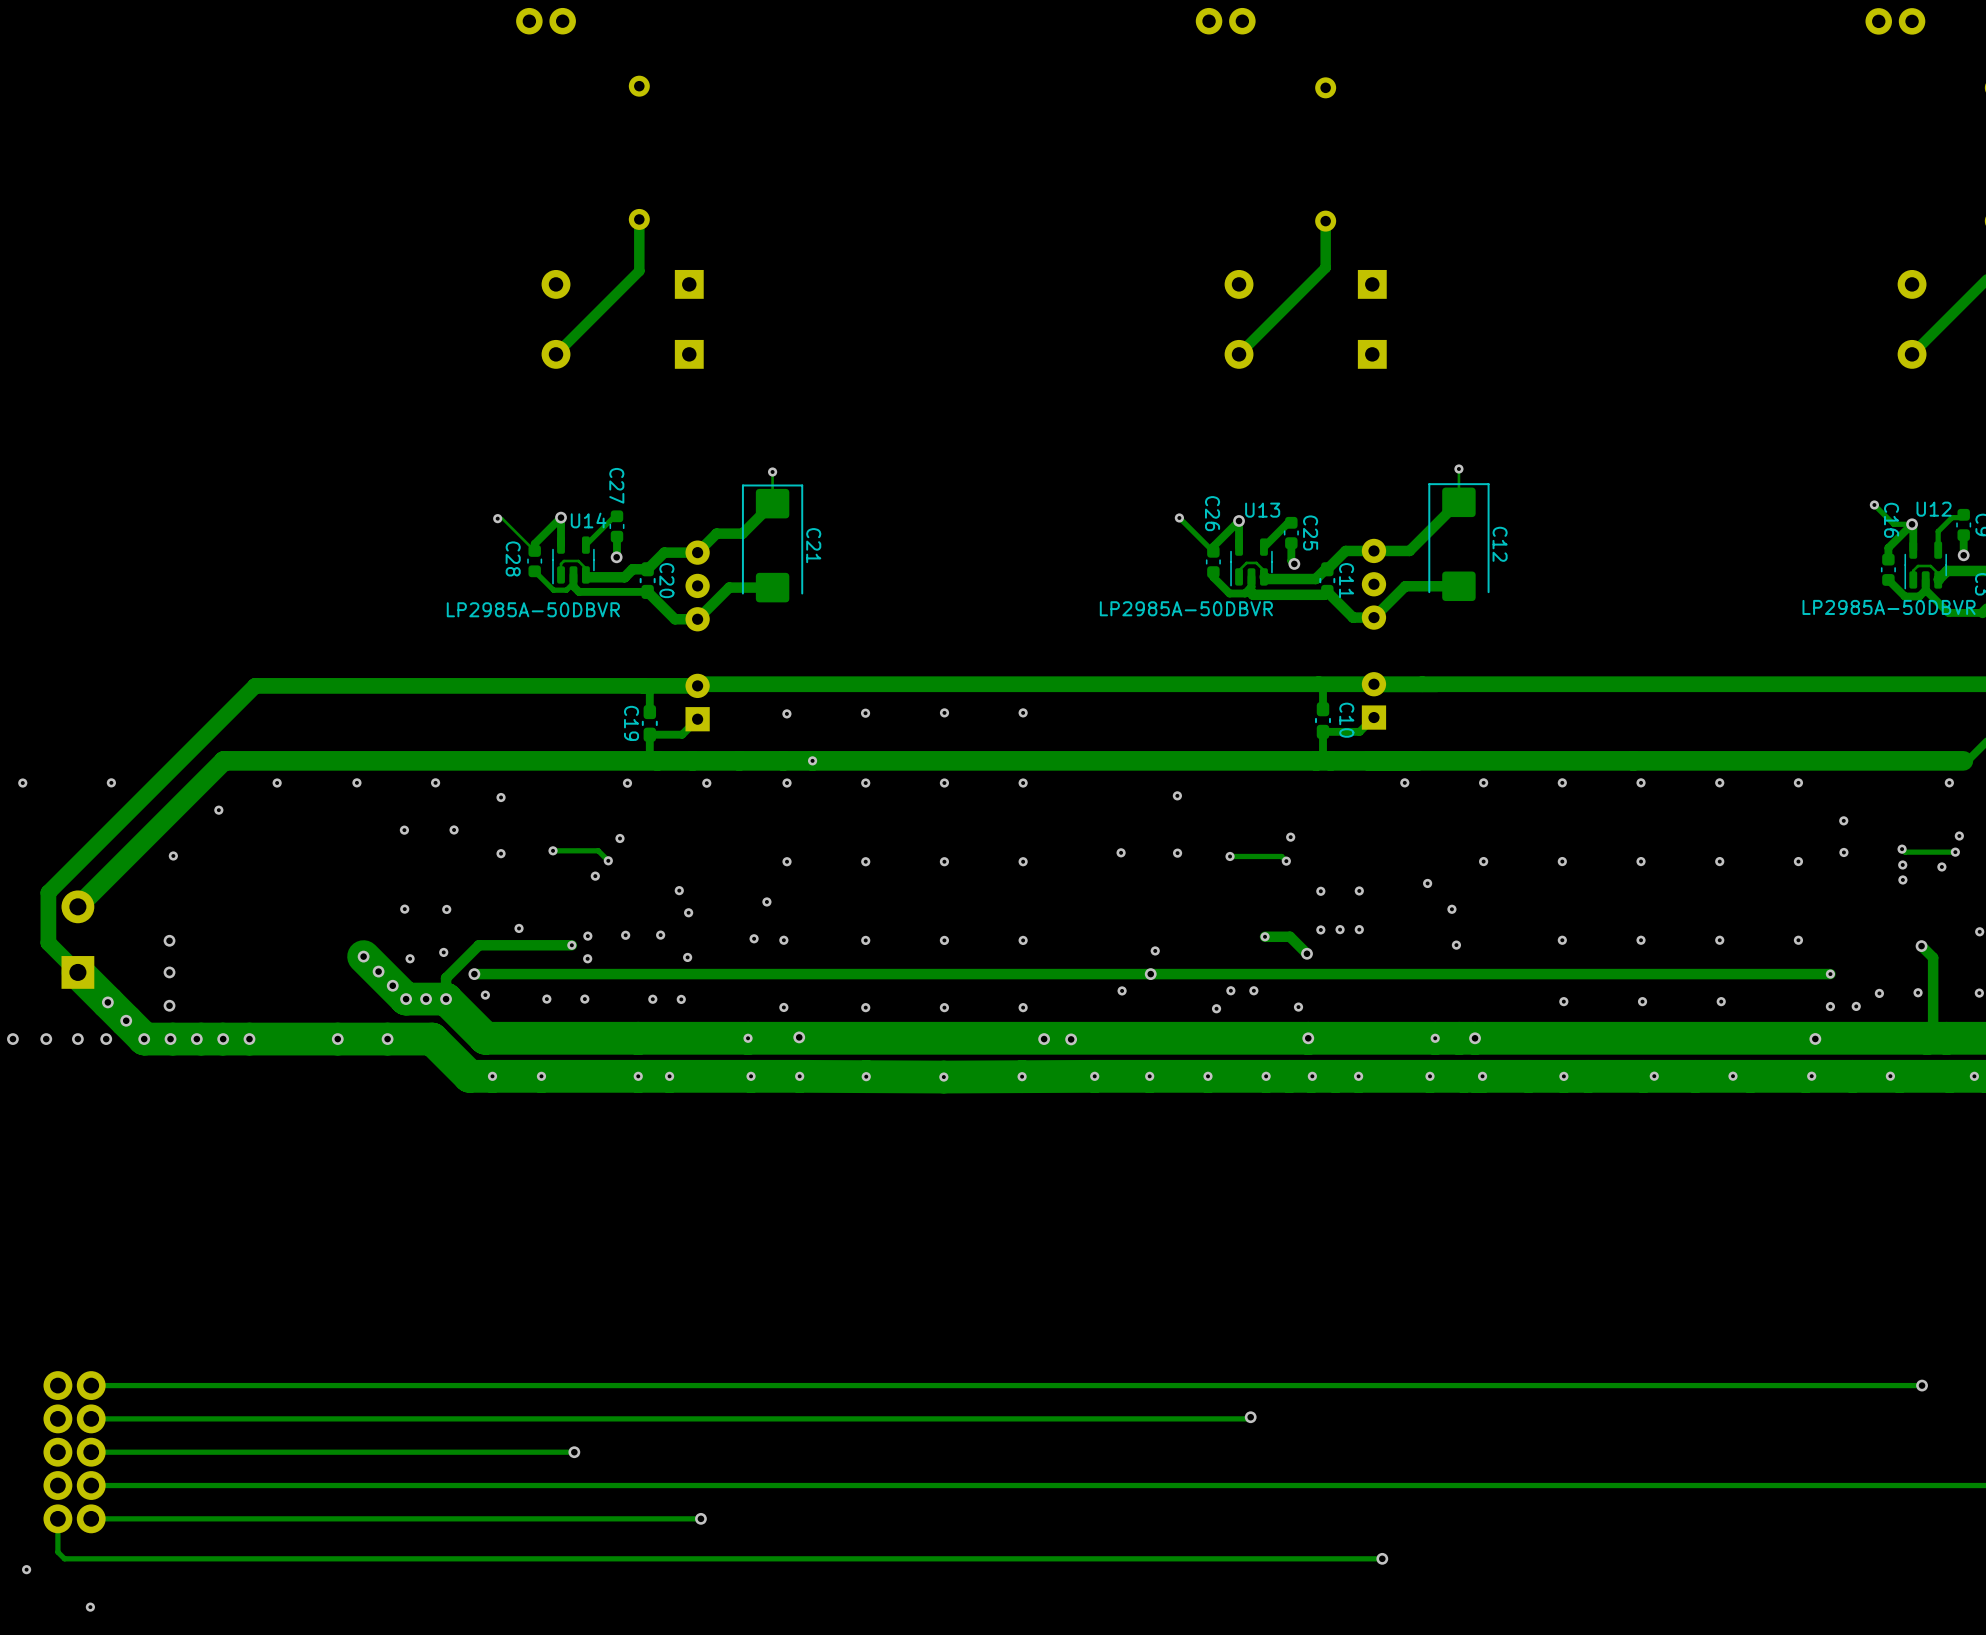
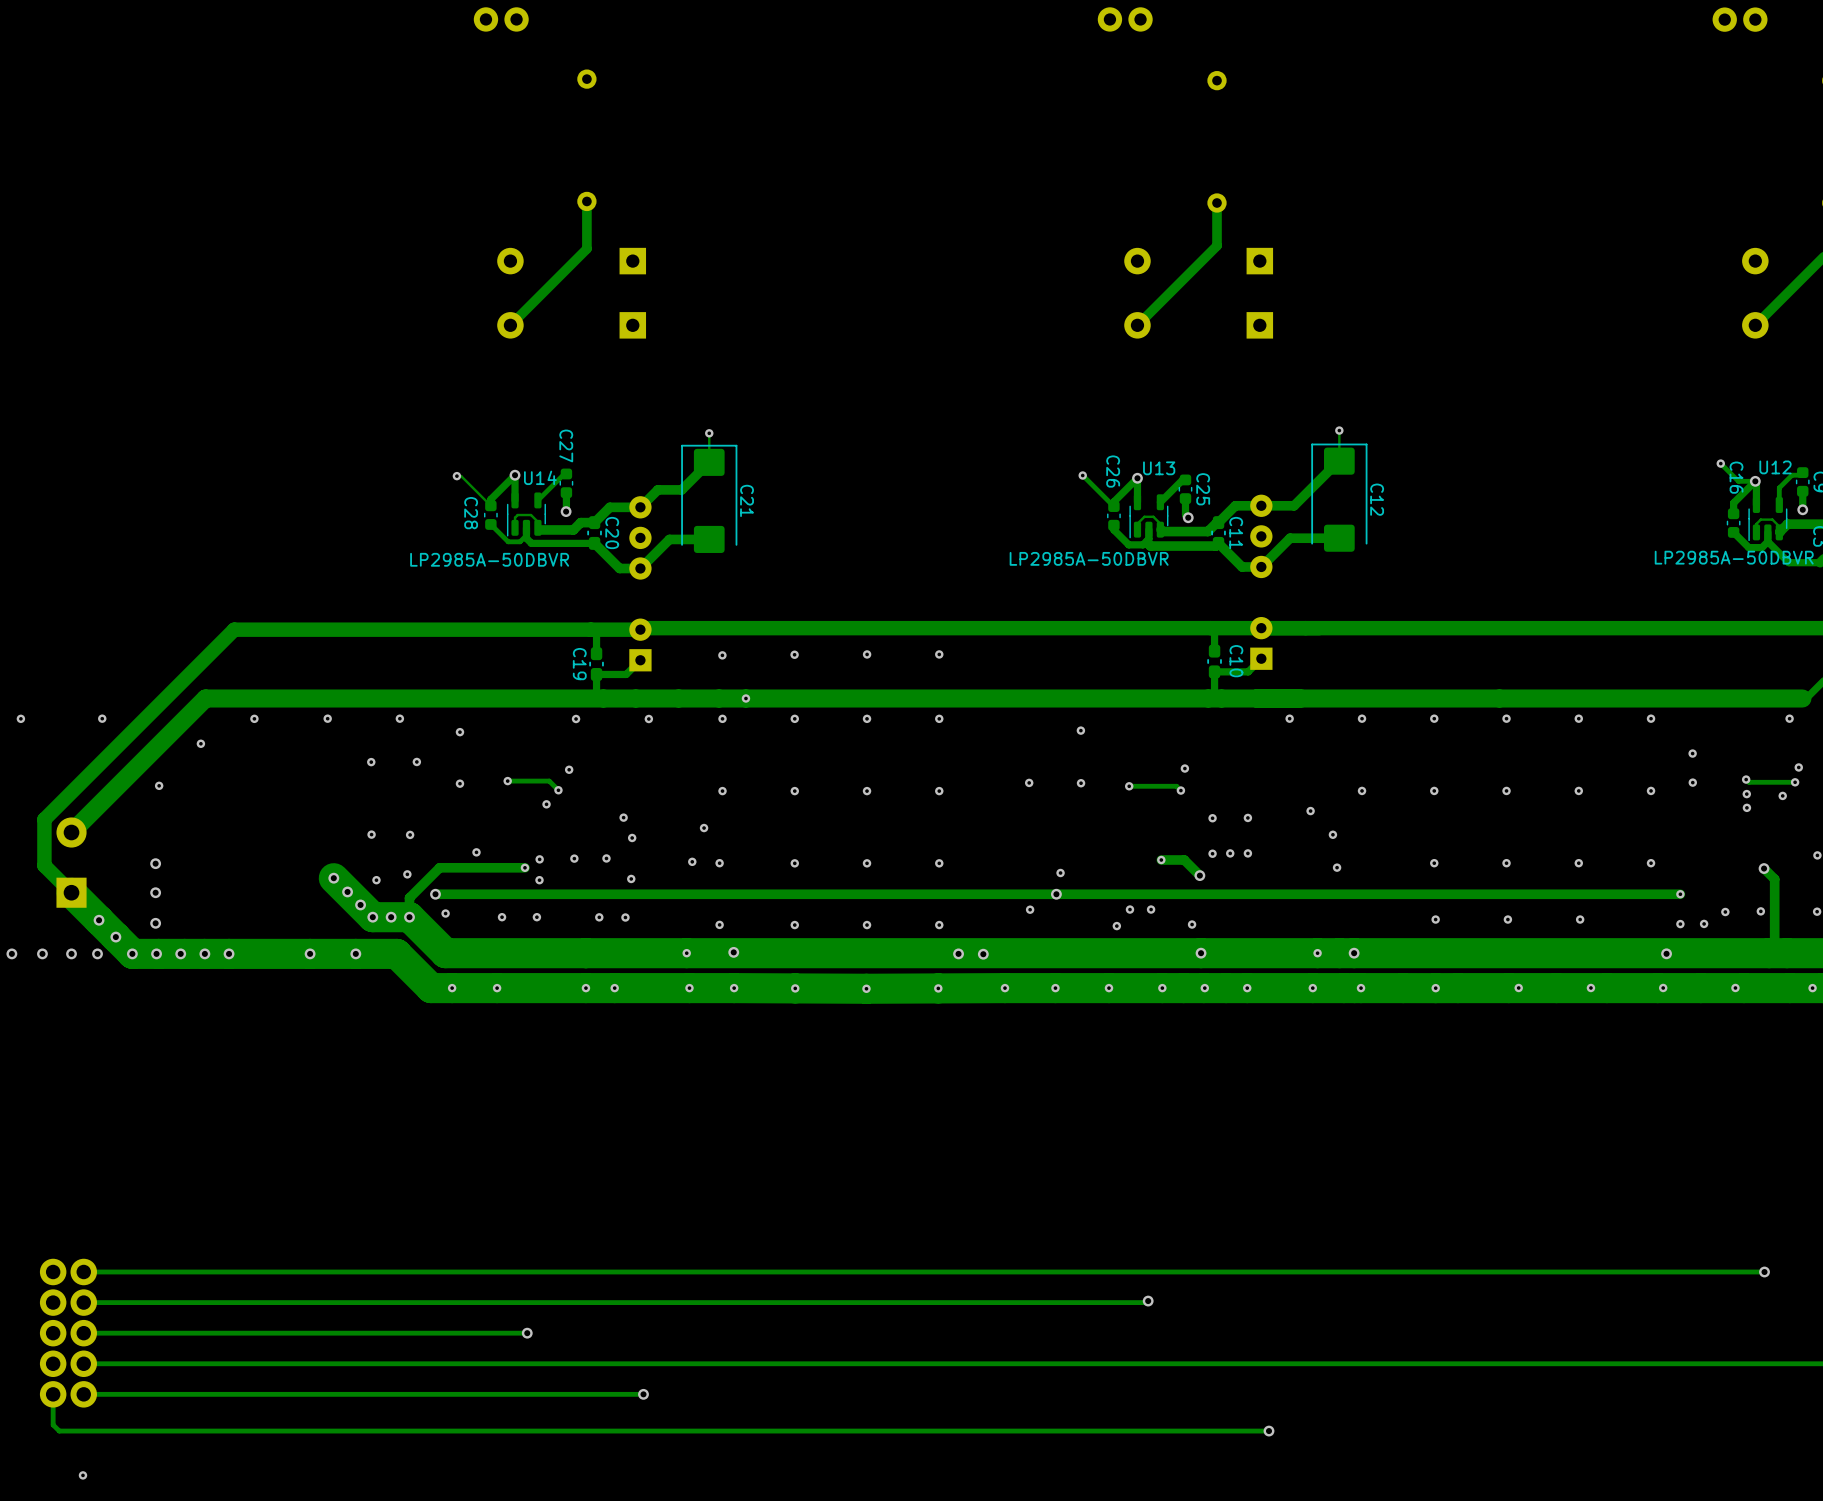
via: (26, 1569) -> none

